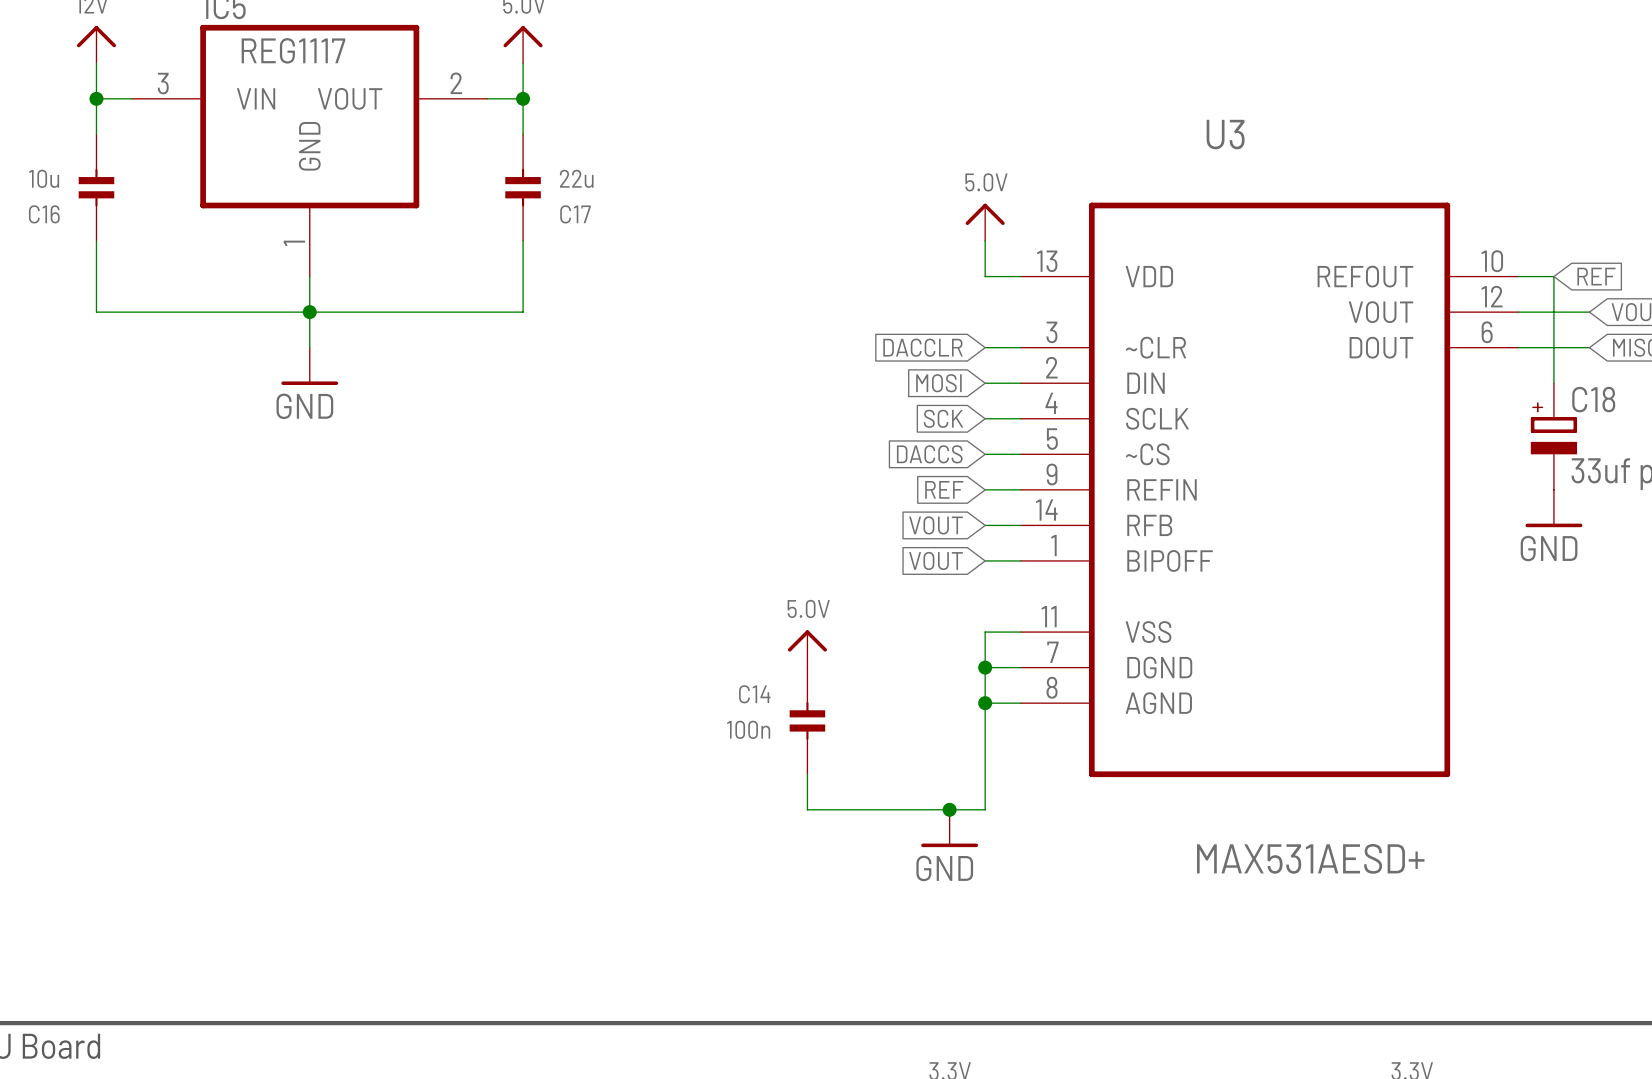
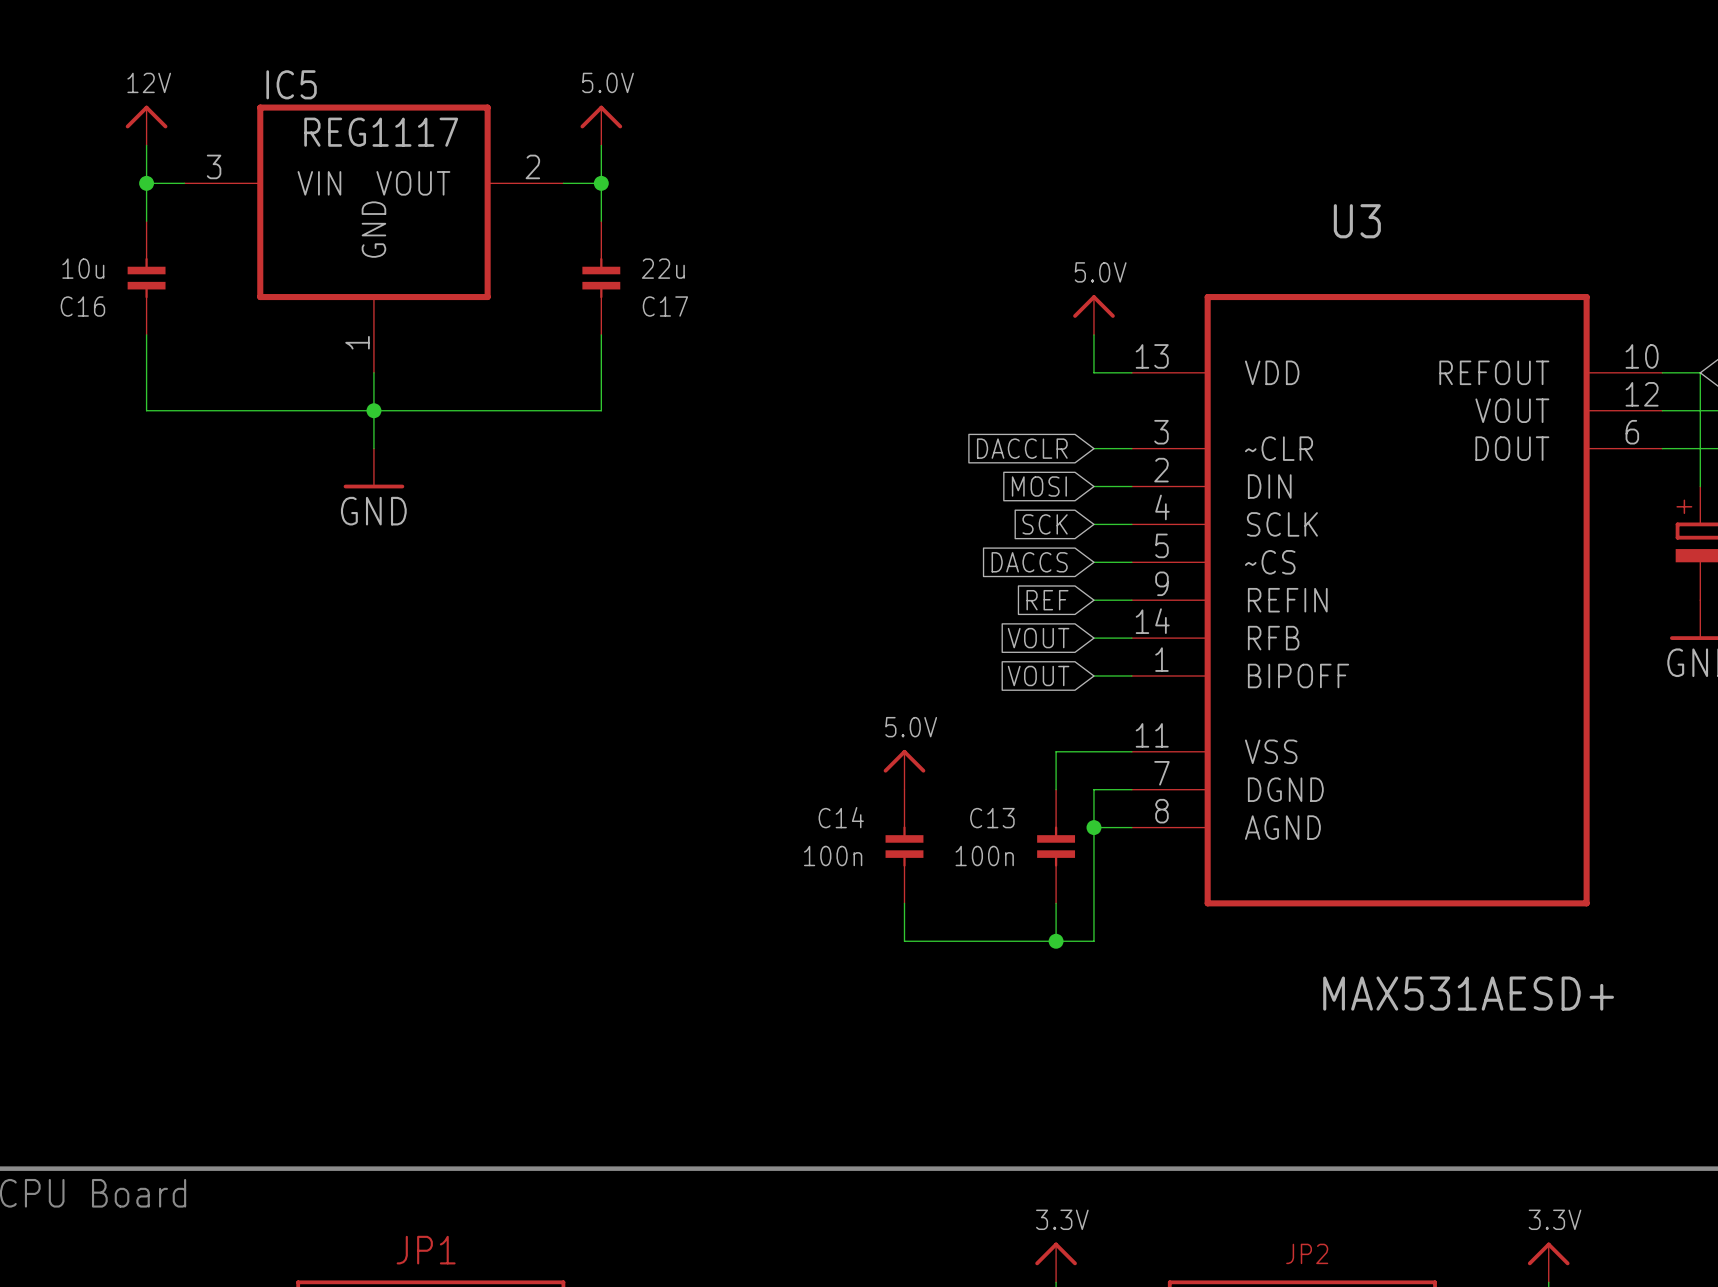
wire: (985, 632) (985, 667) -> (1093, 751) (1056, 751) (1056, 789)
junction: (985, 667) -> none
C13: none -> 100n (1056, 846)
wire: none -> (1056, 903) (1056, 941)
power symbol: GND (949, 828) -> none

